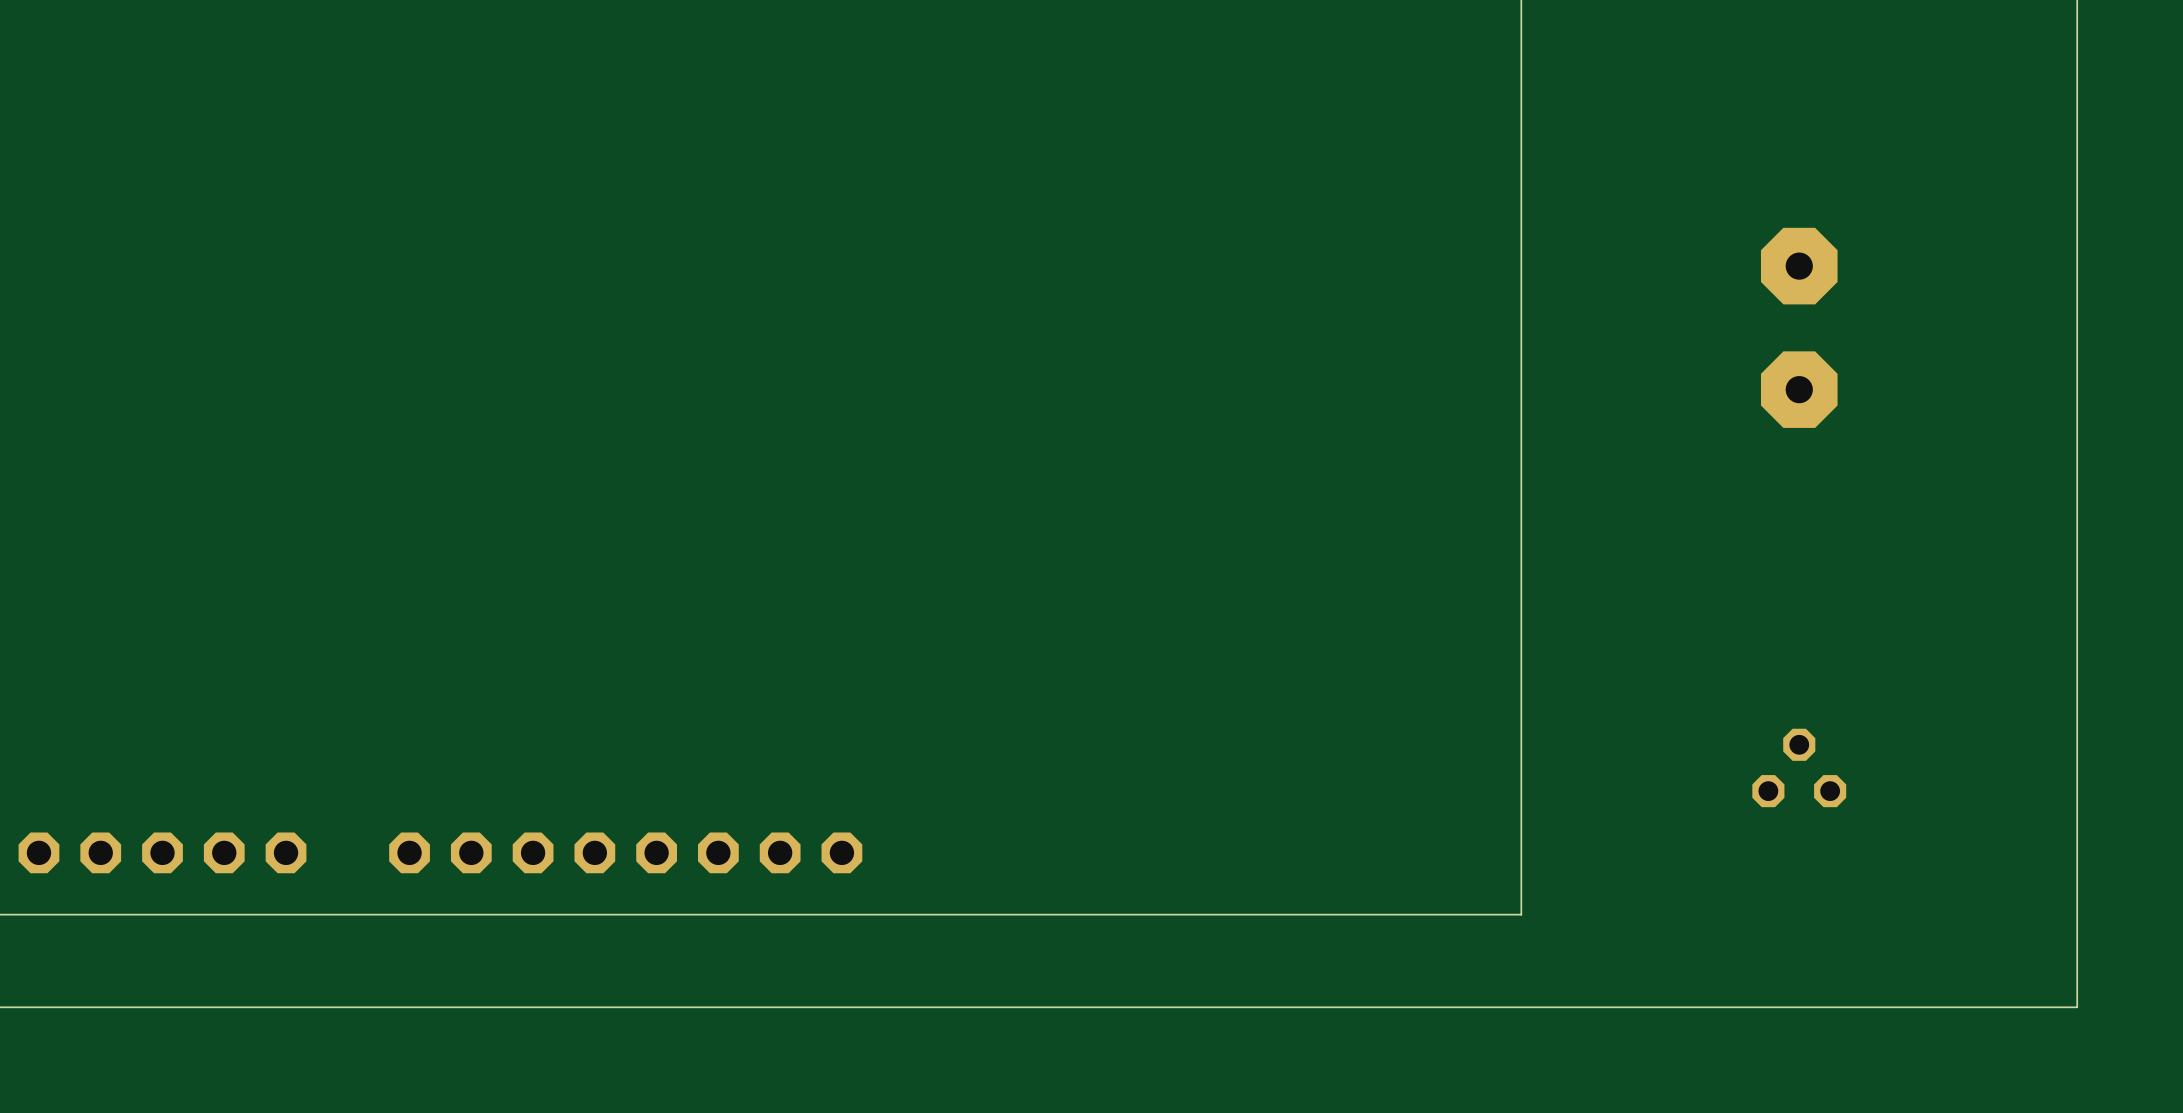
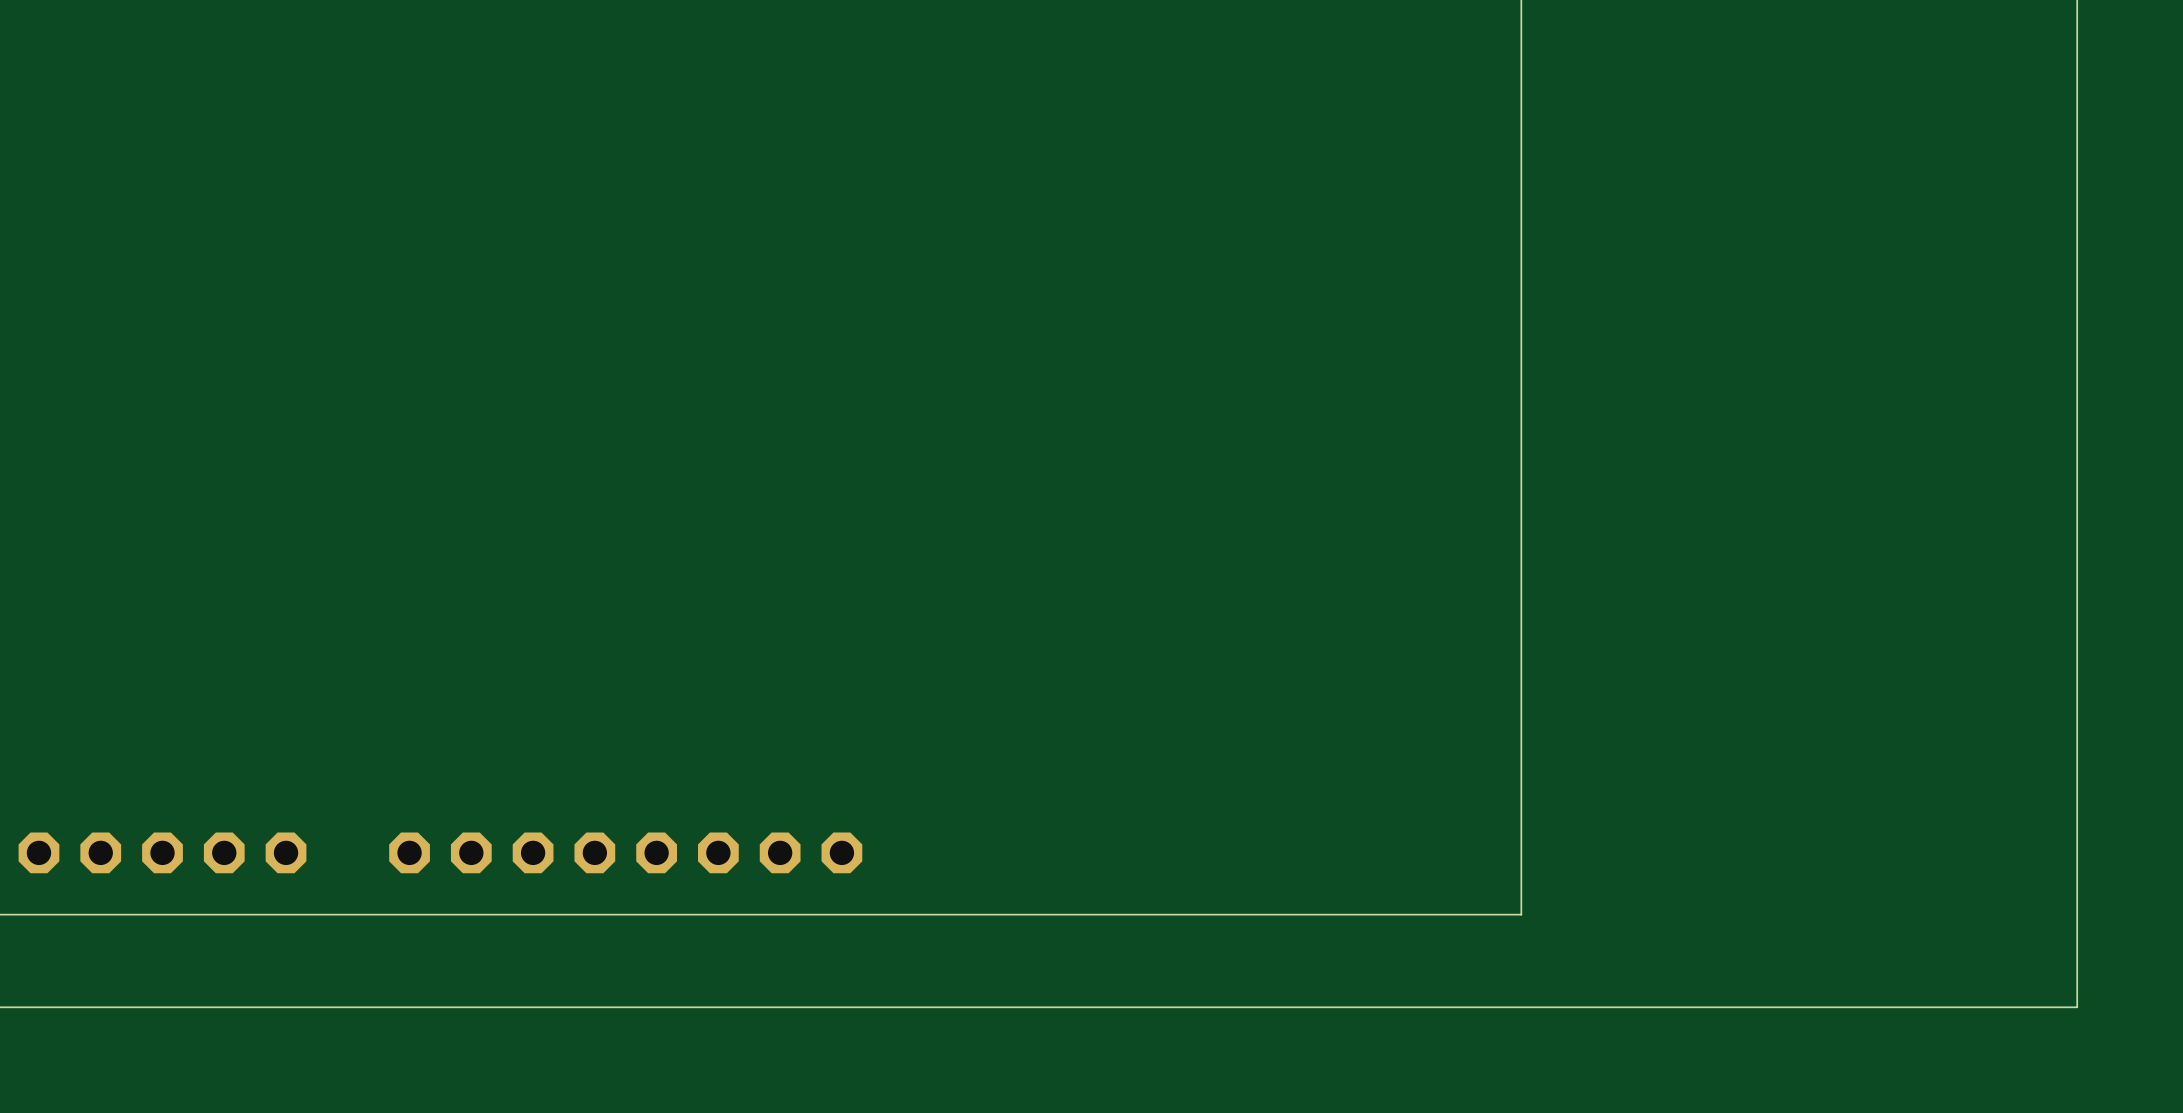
part: (1799, 327) -> none
part: (1799, 767) -> none

